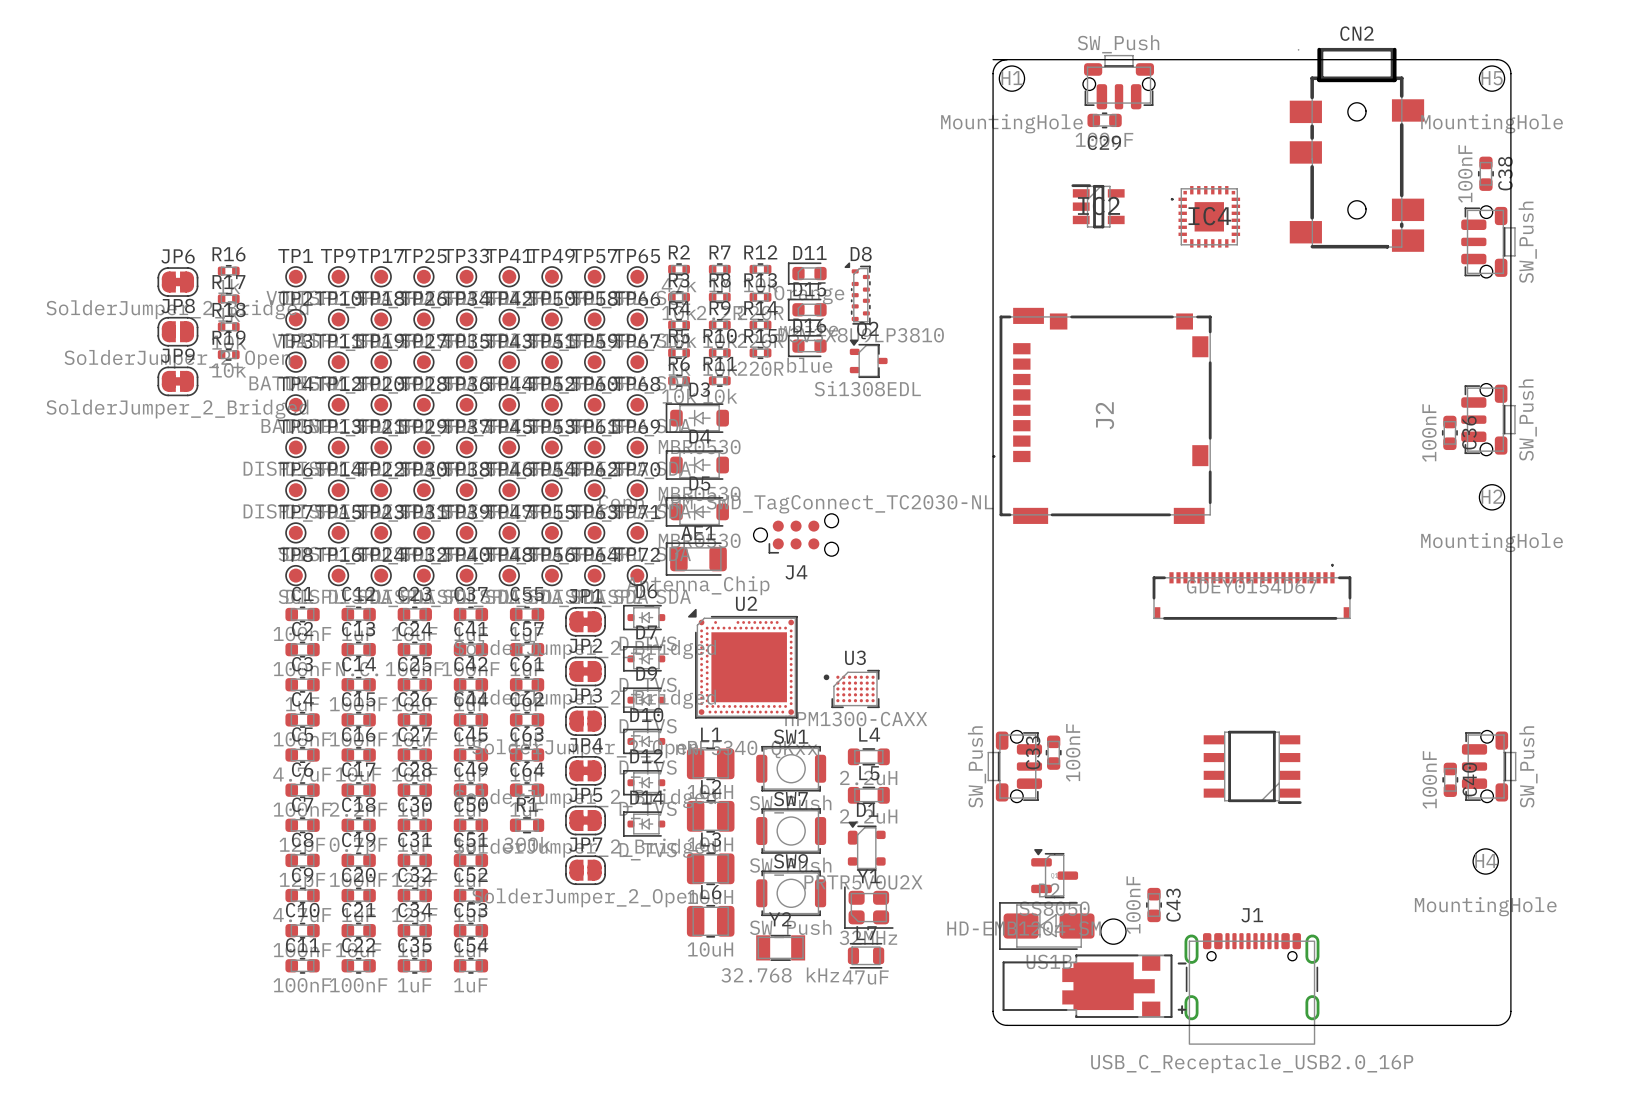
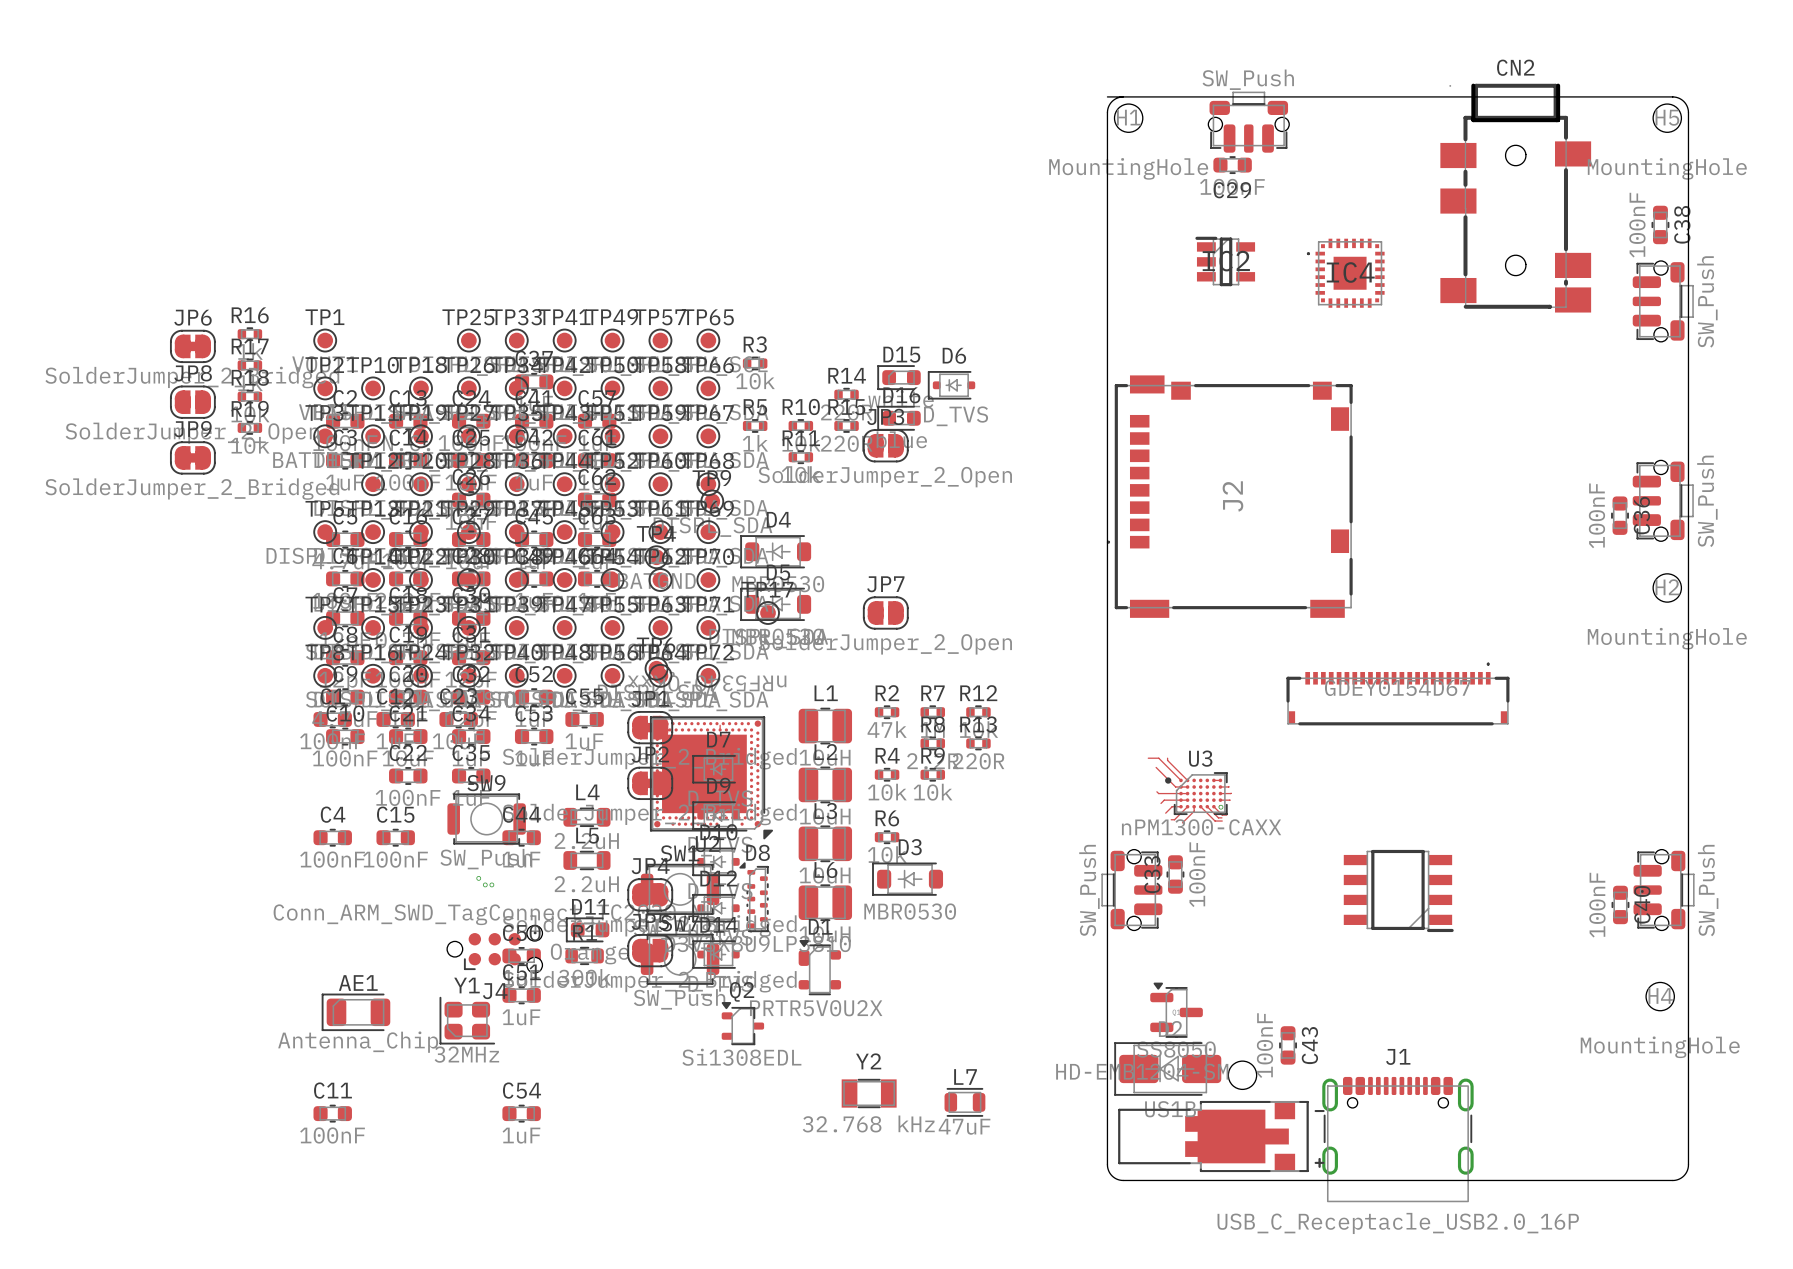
R2 position: (679, 269) -> (887, 712)
R7 position: (719, 269) -> (932, 712)
R12 position: (760, 269) -> (978, 712)
D11 position: (807, 273) -> (587, 929)
TP9 position: (338, 276) -> (712, 501)
TP17 position: (381, 276) -> (768, 612)
D8 position: (857, 293) -> (754, 897)
R8 position: (719, 297) -> (932, 743)
R13 position: (760, 297) -> (978, 743)
R4 position: (679, 325) -> (887, 774)
R9 position: (719, 325) -> (932, 774)
Q2 position: (868, 358) -> (742, 1023)
R6 position: (679, 380) -> (887, 837)
TP4 position: (295, 404) -> (656, 557)
D3 position: (697, 418) -> (907, 879)
TP6 position: (295, 490) -> (656, 668)
J4 position: (796, 535) -> (494, 949)
AE1 position: (696, 559) -> (355, 1012)
C37 position: (470, 614) -> (534, 381)
D6 position: (644, 617) -> (951, 385)
top track: none -> (720, 725) (720, 729)
C2 position: (302, 649) -> (345, 421)
C13 position: (358, 649) -> (408, 421)
C24 position: (414, 649) -> (471, 421)
C41 position: (470, 649) -> (534, 421)
C57 position: (527, 649) -> (597, 421)
top track: none -> (1148, 758) (1158, 758) (1180, 780)
top track: none -> (1167, 758) (1187, 780)
top track: none -> (1156, 767) (1175, 786) (1187, 786)
U2 rotation: 0° (742, 663) -> 180° (711, 777)
U2 position: (742, 663) -> (711, 777)
top track: none -> (1213, 780) (1220, 780)
top track: none -> (1220, 786) (1228, 786)
top track: none -> (1156, 791) (1158, 793) (1187, 793)
top track: none -> (1231, 793) (1220, 793)
C3 position: (302, 684) -> (345, 460)
C14 position: (358, 684) -> (408, 460)
C25 position: (414, 684) -> (471, 460)
C42 position: (470, 684) -> (534, 460)
C61 position: (527, 684) -> (597, 460)
top track: none -> (1187, 800) (1164, 800) (1161, 803)
top track: none -> (1220, 800) (1229, 800)
U3 position: (851, 688) -> (1196, 793)
top track: none -> (1180, 806) (1172, 806) (1165, 813)
top track: none -> (1187, 806) (1174, 819) (1171, 819)
top track: none -> (1194, 806) (1194, 811) (1182, 822)
top track: none -> (1200, 806) (1215, 821) (1222, 821)
top track: none -> (1207, 806) (1218, 817) (1221, 817)
top track: none -> (1213, 806) (1222, 815) (1226, 815)
via: none -> (1220, 807)
C26 position: (414, 719) -> (471, 500)
C62 position: (527, 719) -> (597, 500)
JP3 position: (585, 721) -> (885, 445)
C5 position: (302, 755) -> (345, 539)
C16 position: (358, 755) -> (408, 539)
C27 position: (414, 755) -> (471, 539)
C45 position: (470, 755) -> (534, 539)
C63 position: (527, 755) -> (597, 539)
via: none -> (478, 878)
L4 position: (868, 756) -> (586, 817)
via: none -> (485, 884)
via: none -> (491, 884)
L1 position: (710, 763) -> (825, 726)
SW1 position: (791, 768) -> (680, 889)
C6 position: (302, 790) -> (345, 578)
C17 position: (358, 790) -> (408, 578)
C28 position: (414, 790) -> (471, 578)
C49 position: (470, 790) -> (534, 578)
C64 position: (527, 790) -> (597, 578)
L5 position: (868, 795) -> (586, 860)
L2 position: (710, 816) -> (825, 784)
C7 position: (302, 825) -> (345, 618)
C18 position: (358, 825) -> (408, 618)
C30 position: (414, 825) -> (471, 618)
SW7 position: (791, 831) -> (680, 959)
D1 position: (866, 846) -> (819, 967)
C8 position: (302, 860) -> (345, 657)
C19 position: (358, 860) -> (408, 657)
C31 position: (414, 860) -> (471, 657)
L3 position: (710, 868) -> (825, 843)
JP7 position: (585, 870) -> (885, 612)
SW9 position: (791, 893) -> (486, 819)
C9 position: (302, 895) -> (345, 697)
C20 position: (358, 895) -> (408, 697)
C32 position: (414, 895) -> (471, 697)
C52 position: (470, 895) -> (534, 697)
Y1 position: (868, 907) -> (467, 1020)
L6 position: (710, 921) -> (825, 902)
C10 position: (302, 930) -> (345, 736)
C21 position: (358, 930) -> (408, 736)
C34 position: (414, 930) -> (471, 736)
C53 position: (470, 930) -> (534, 736)
C22 position: (358, 965) -> (408, 775)
C35 position: (414, 965) -> (471, 775)

